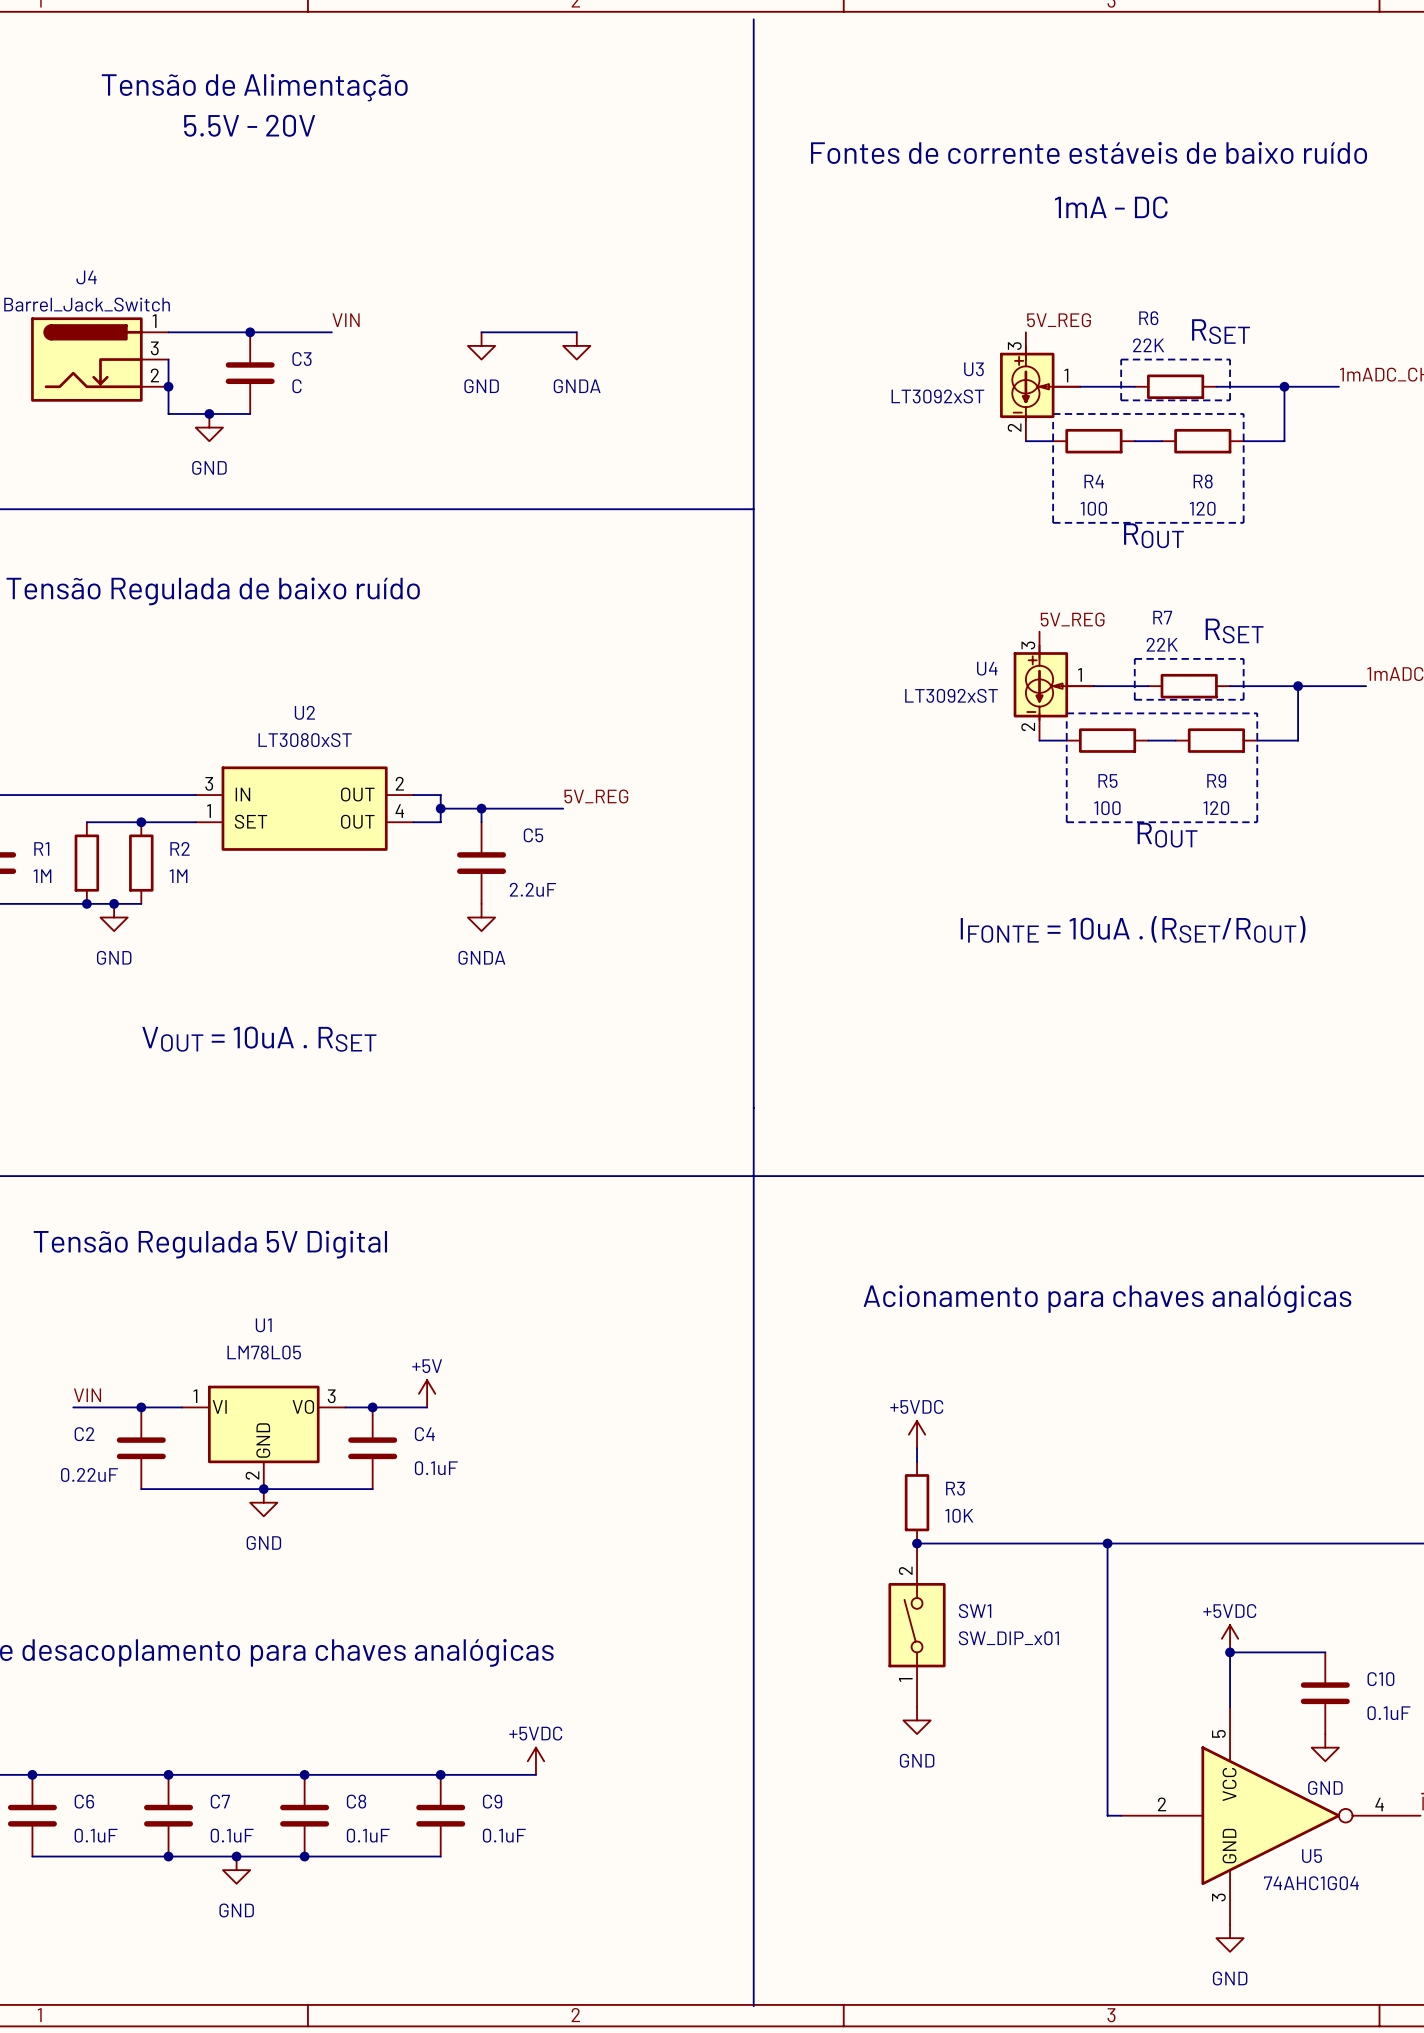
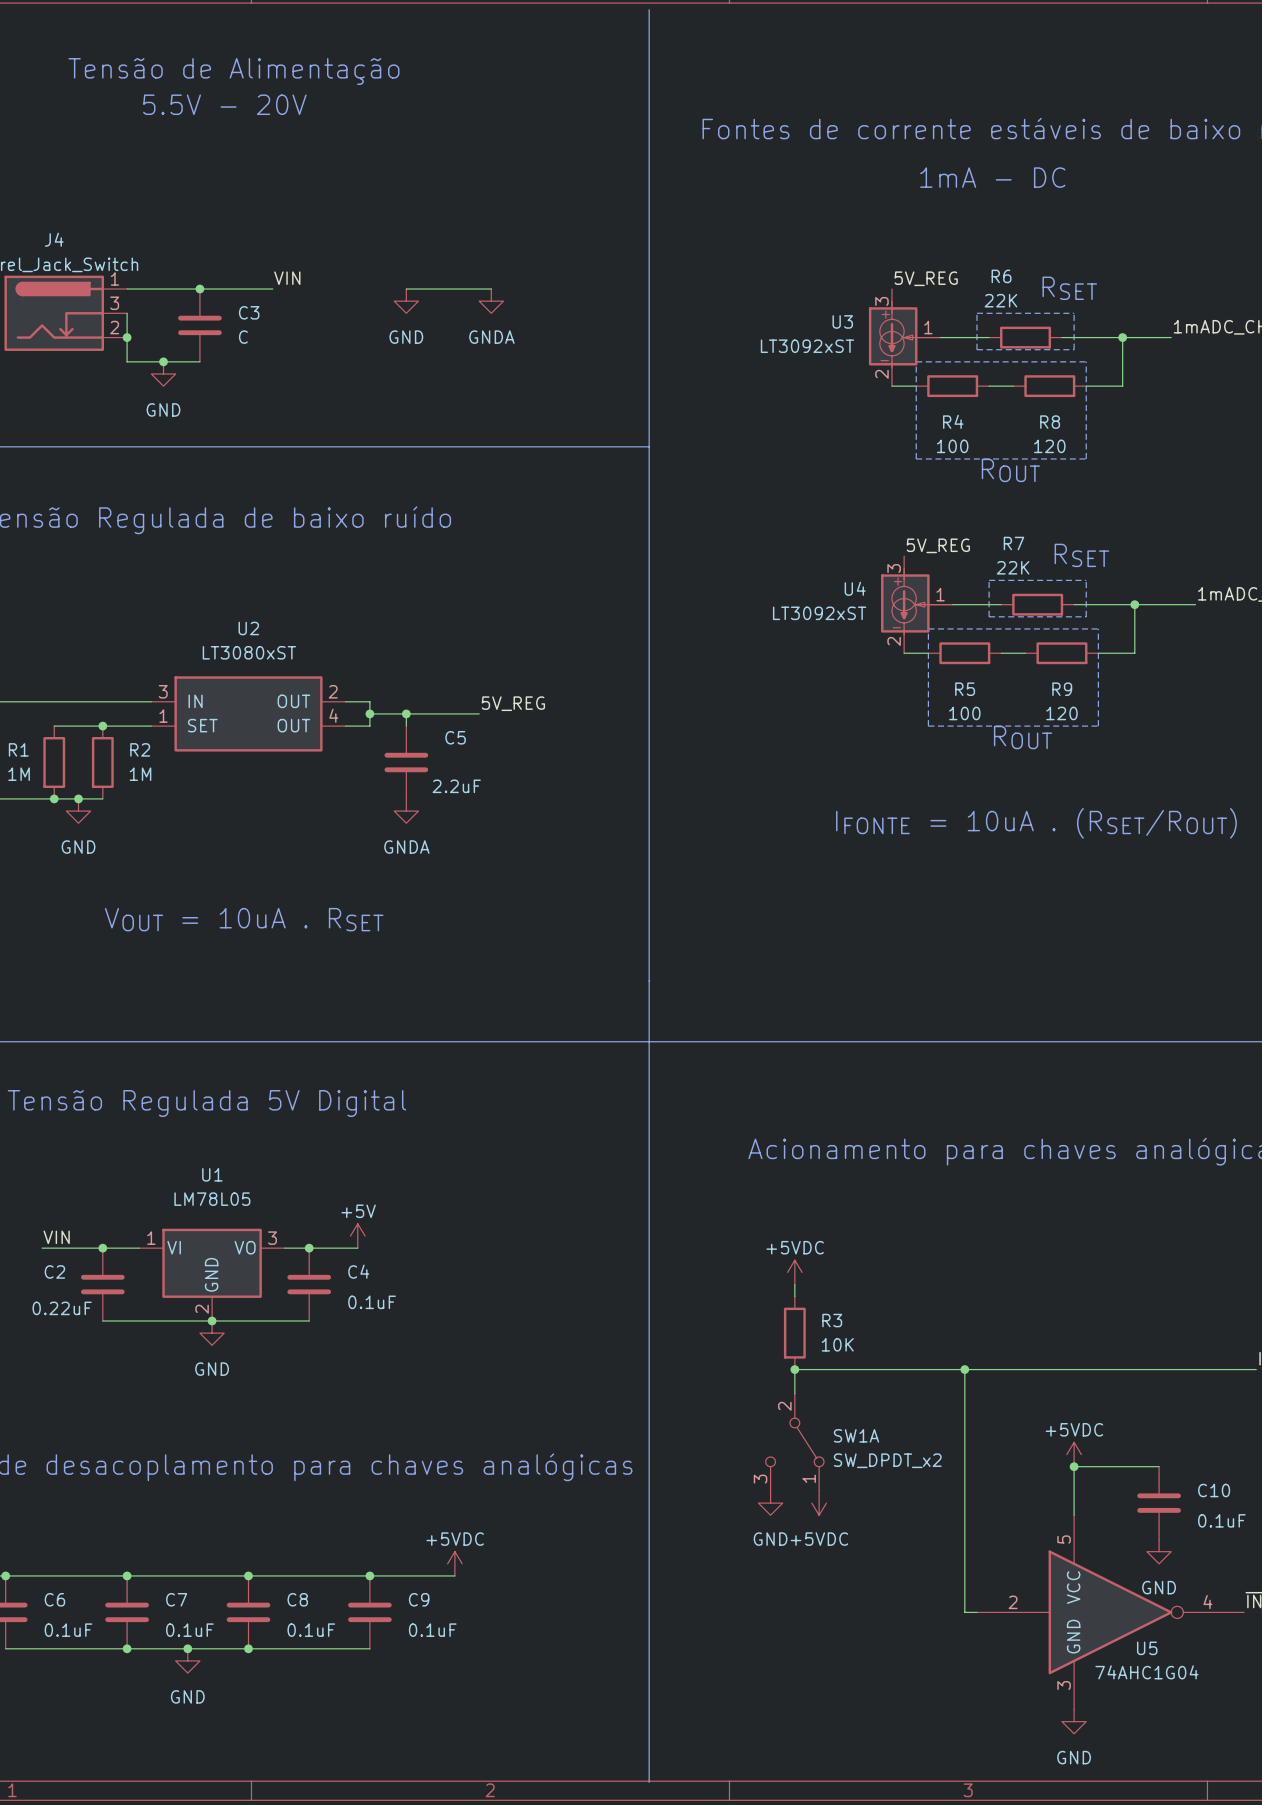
SW1: SW_DIP_x01 (917, 1625) -> none
SW1A: none -> SW_DPDT_x2 (794, 1442)
power symbol: none -> +5VDC (819, 1503)
power symbol position: GND (917, 1720) -> GND (770, 1503)

